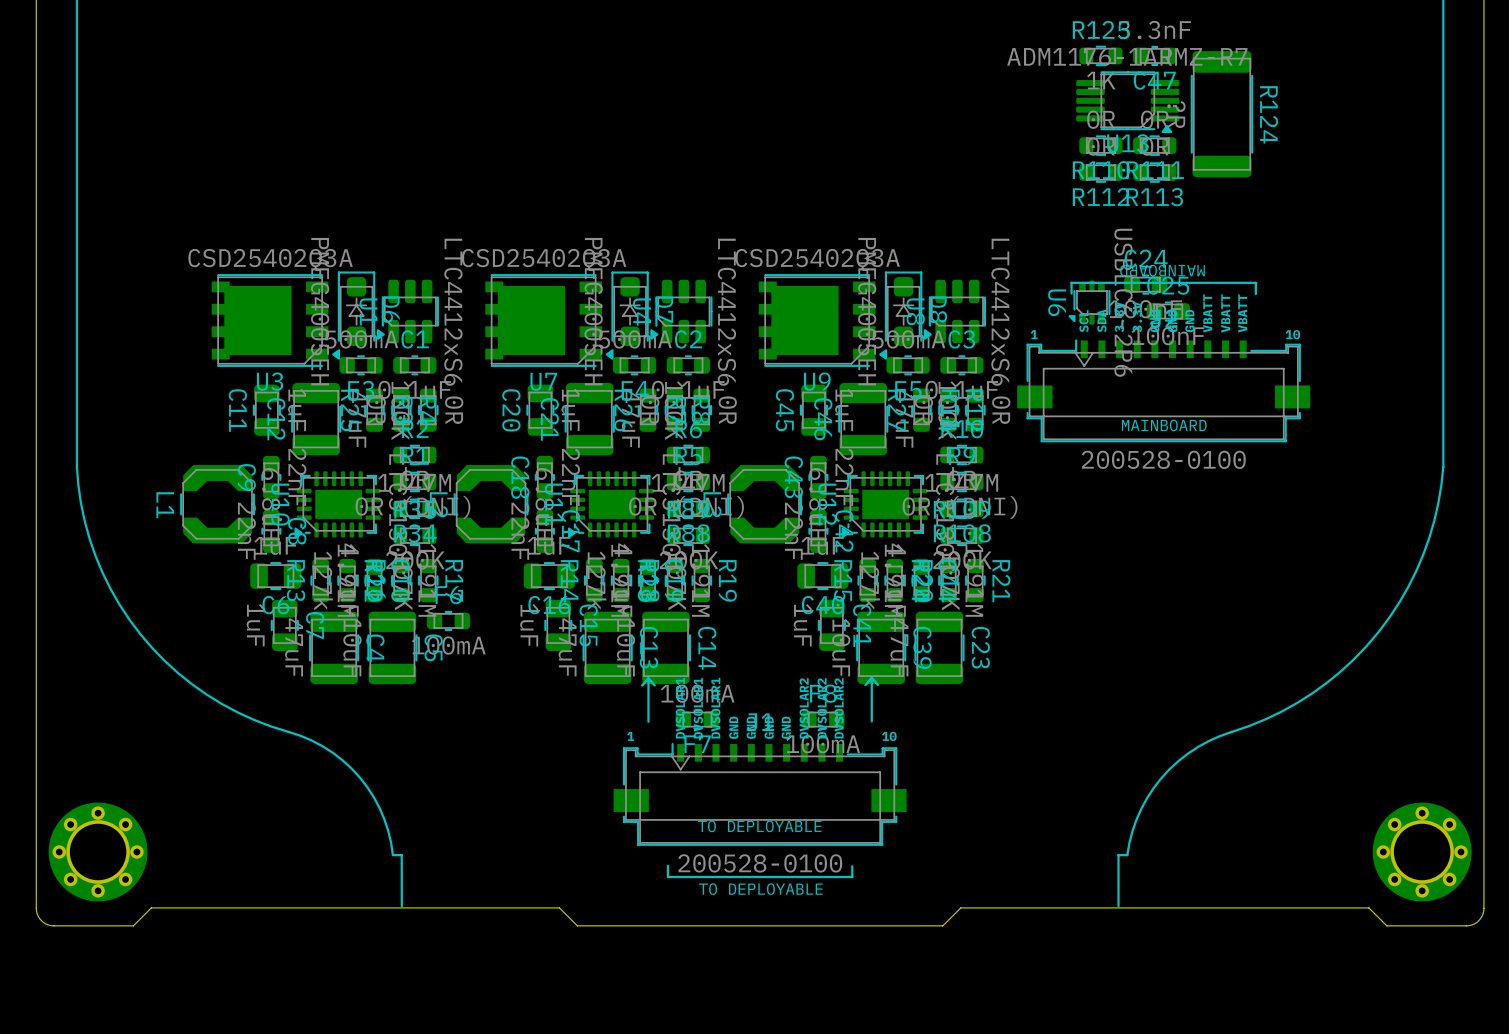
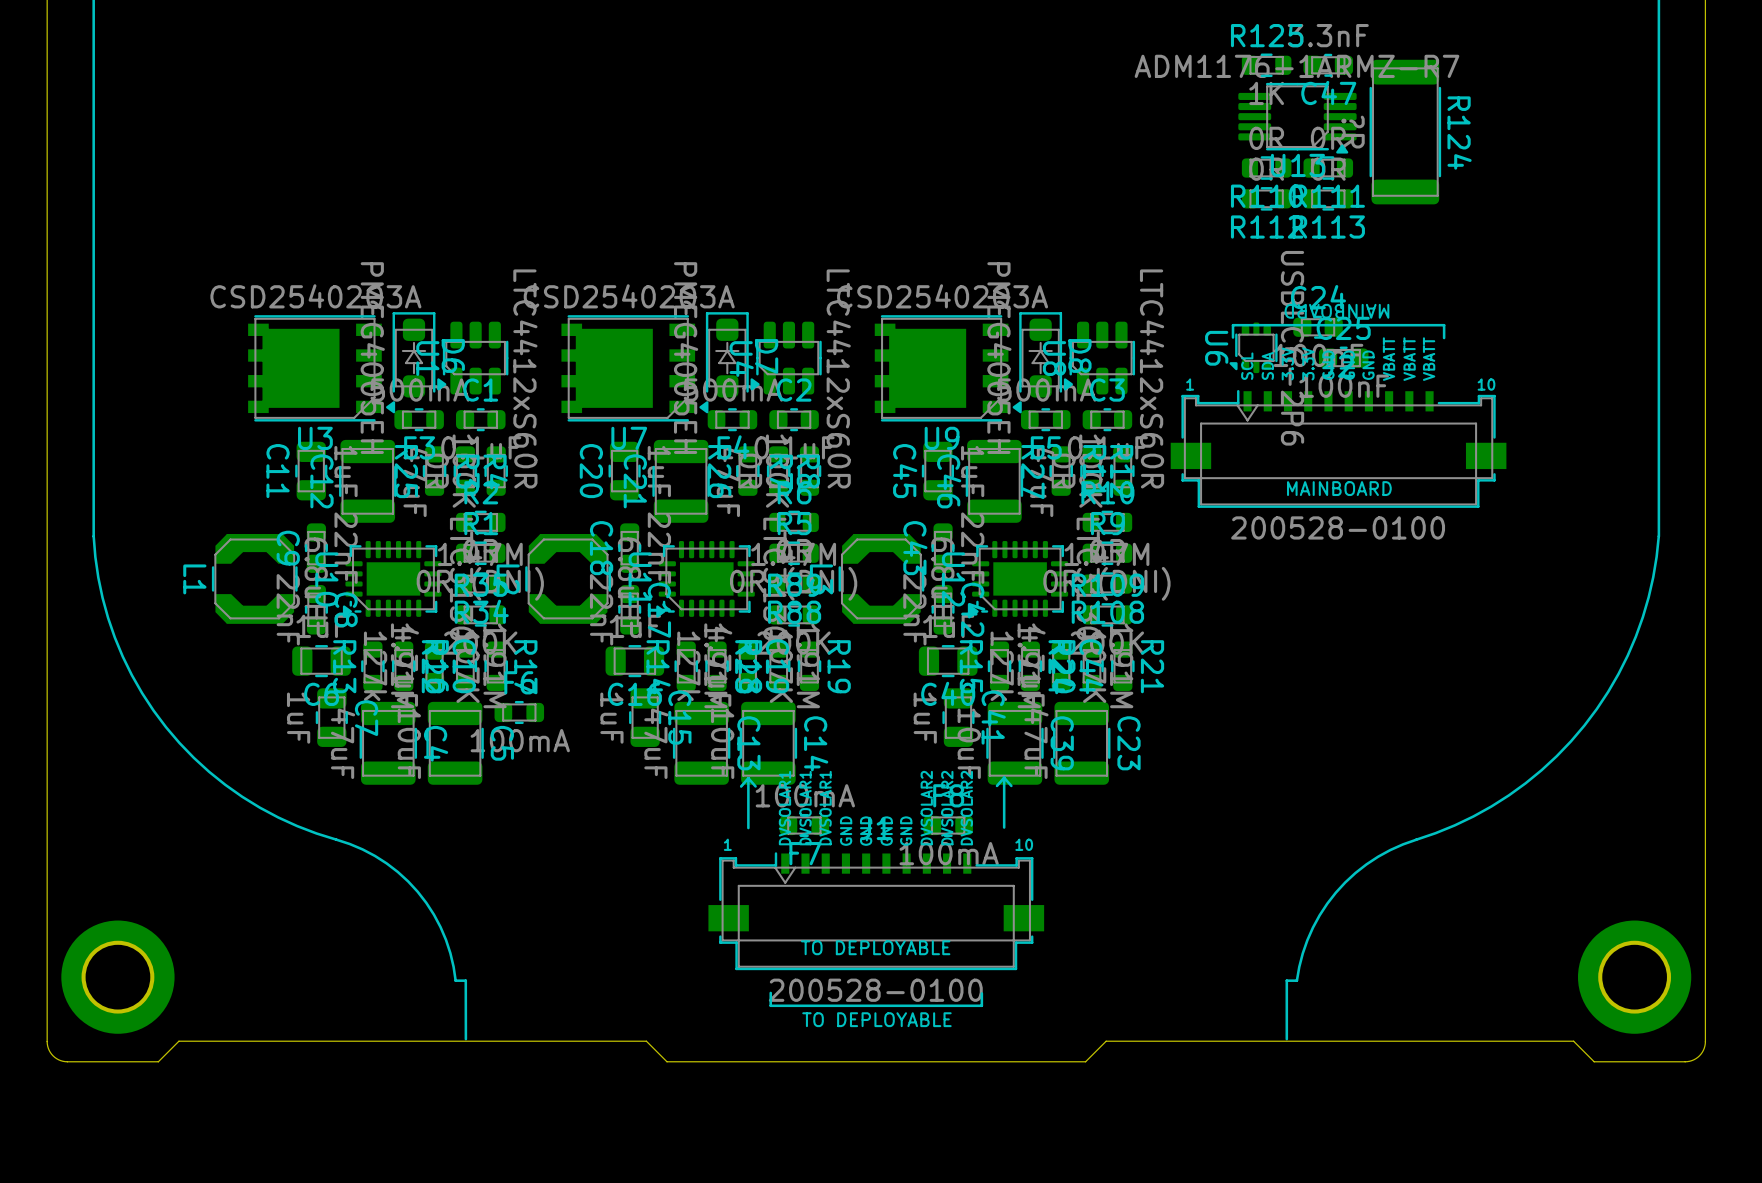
part footprint: [48, 802, 148, 902] -> [61, 920, 175, 1034]
part footprint: [1372, 802, 1472, 902] -> [1577, 920, 1692, 1034]

